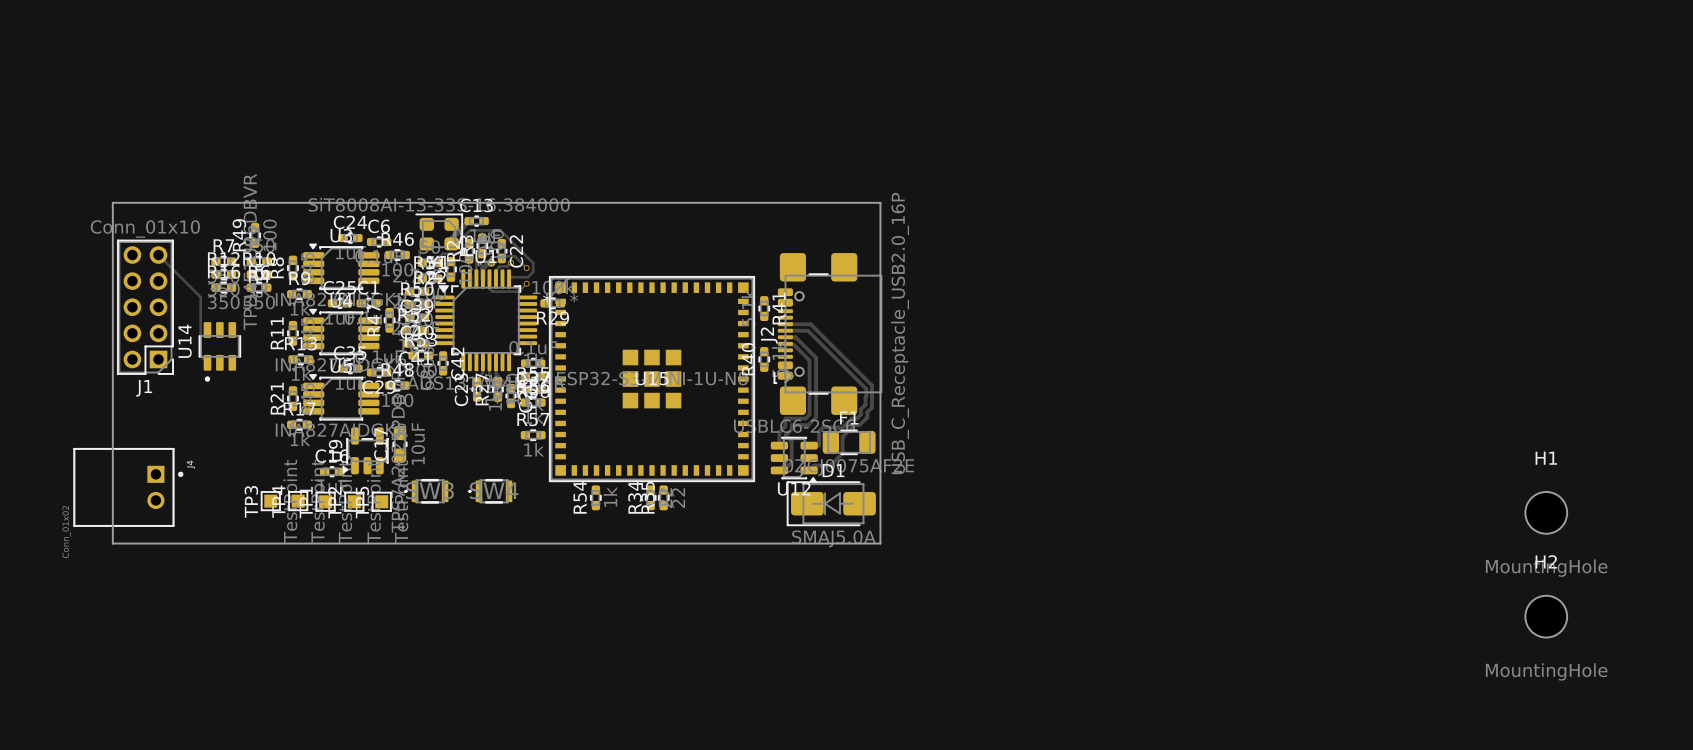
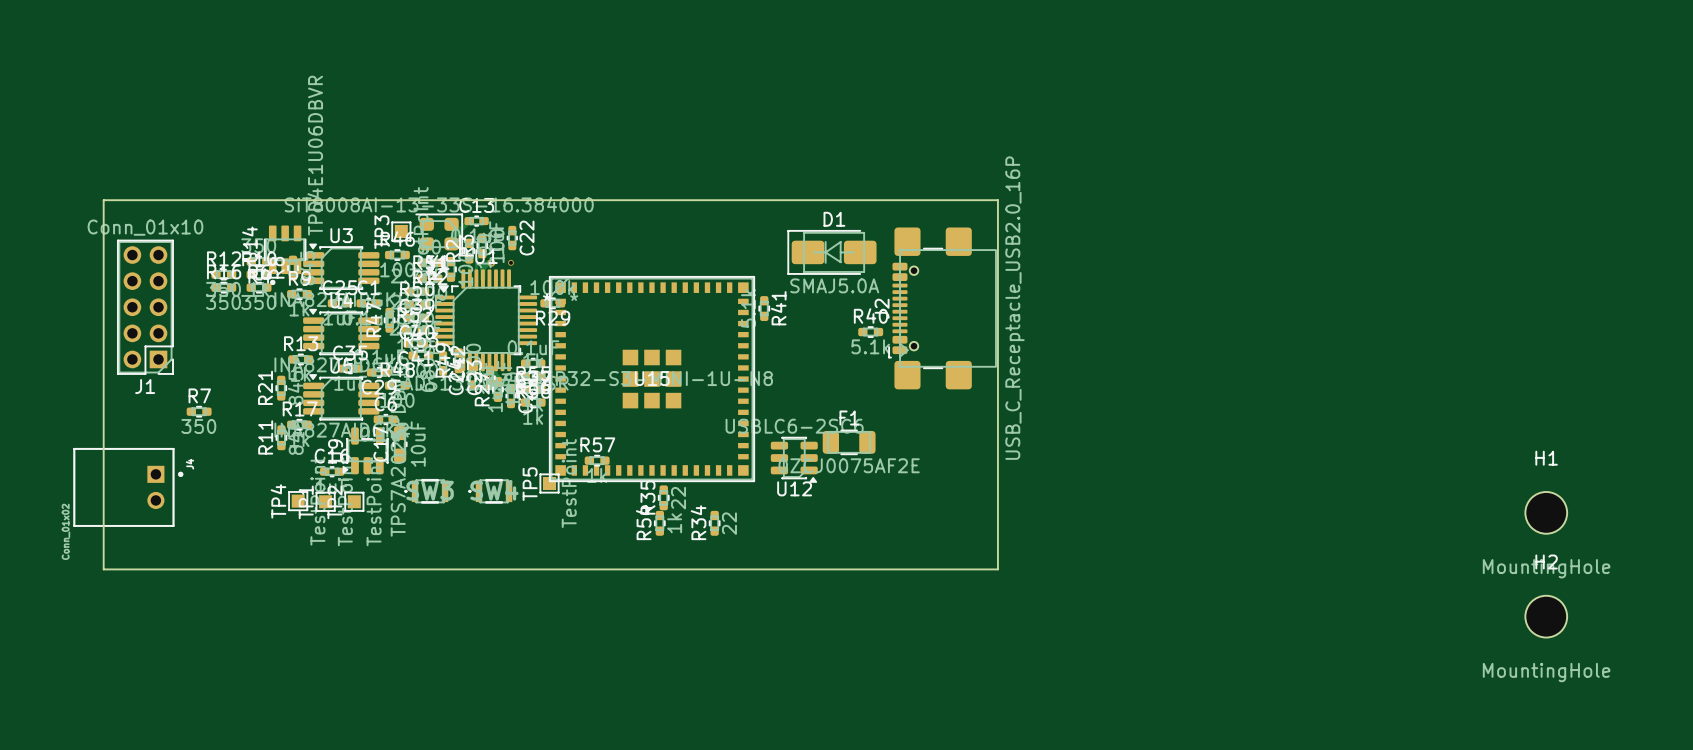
board edge: (112, 202) (880, 202) (880, 543) (112, 543) (112, 202) -> (103, 200) (103, 569) (997, 569) (997, 200) (103, 200)
R49 position: (255, 235) -> (458, 360)
C24 rotation: 0° (350, 238) -> 90° clockwise (471, 377)
C24 position: (350, 238) -> (471, 377)
C6 position: (379, 241) -> (385, 419)
C22 position: (501, 251) -> (512, 238)
track: (158, 255) (200, 297) (200, 356) (207, 362) -> none
track: (501, 258) (504, 256) (514, 256) (526, 268) -> none
R7 position: (223, 261) -> (199, 411)
track: (437, 262) (437, 258) (442, 253) (462, 253) (462, 238) (470, 230) (500, 230) (533, 263) (533, 272) (527, 277) (510, 277) (509, 279) -> none
track: (511, 262) (507, 266) (499, 266) (495, 270) (495, 279) -> none
via: (526, 268) -> none
track: (489, 279) (489, 288) (492, 291) (518, 291) (526, 283) -> none
via: (526, 283) -> none
track: (785, 324) (810, 324) (872, 385) (872, 407) (867, 412) (867, 417) (859, 425) (854, 425) (842, 436) (842, 453) (830, 465) (814, 465) (809, 470) -> none
track: (785, 330) (808, 330) (866, 389) (865, 404) (856, 418) (851, 418) (840, 429) (838, 427) (823, 427) (819, 431) (819, 445) (809, 445) -> none
R11 position: (292, 333) -> (281, 437)
J2 position: (827, 334) -> (942, 308)
track: (785, 337) (795, 337) (816, 357) (816, 417) (808, 425) (791, 425) (791, 429) (785, 435) (785, 438) (791, 441) (791, 462) (779, 470) -> none
track: (785, 343) (793, 344) (809, 360) (809, 414) (805, 418) (785, 418) (785, 426) (779, 432) (779, 445) -> none
U14 position: (219, 351) -> (285, 255)
R40 rotation: 0° (764, 359) -> 90° clockwise (870, 332)
R40 position: (764, 359) -> (870, 332)
C23 position: (477, 389) -> (490, 377)
R21 position: (292, 398) -> (281, 388)
R57 position: (533, 435) -> (597, 460)
R54 position: (595, 497) -> (659, 523)
R34 position: (650, 497) -> (714, 523)
TP3 position: (270, 501) -> (401, 231)
TP5 position: (381, 501) -> (549, 483)
D1 position: (831, 503) -> (832, 252)

